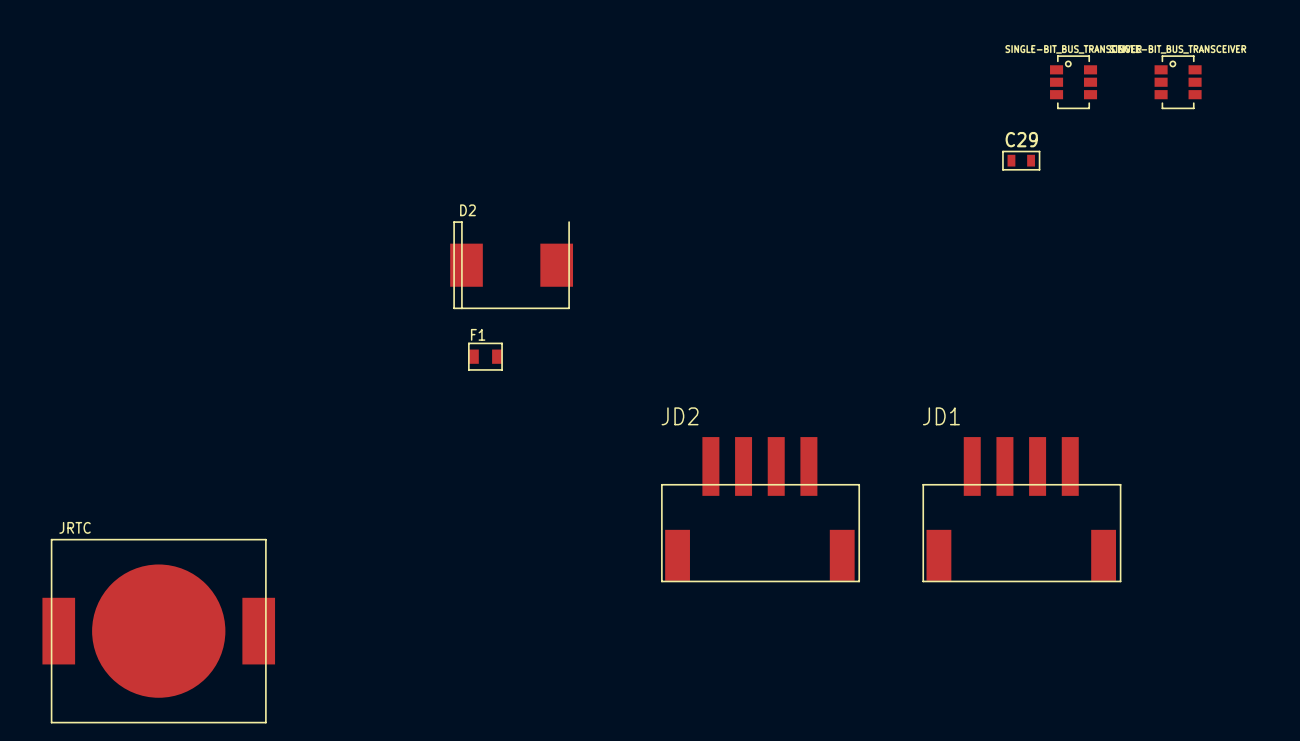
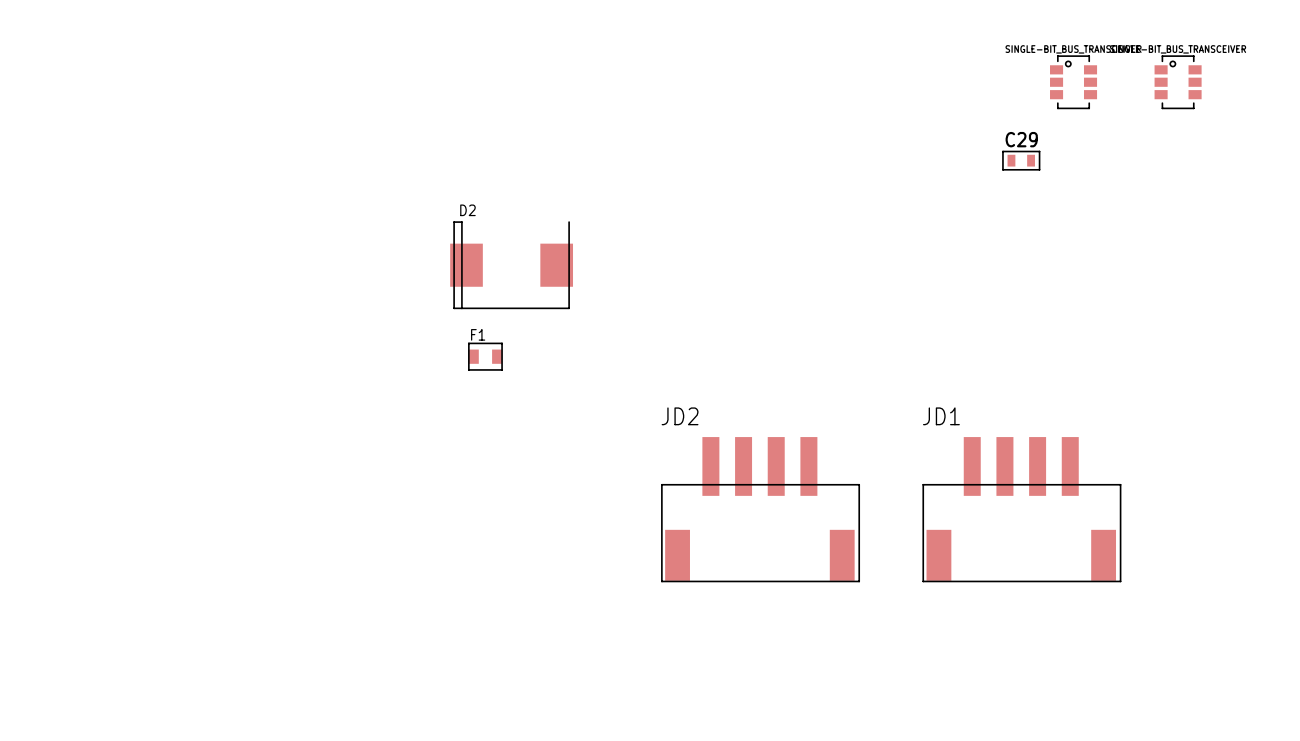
JRTC: (158, 631) -> none

